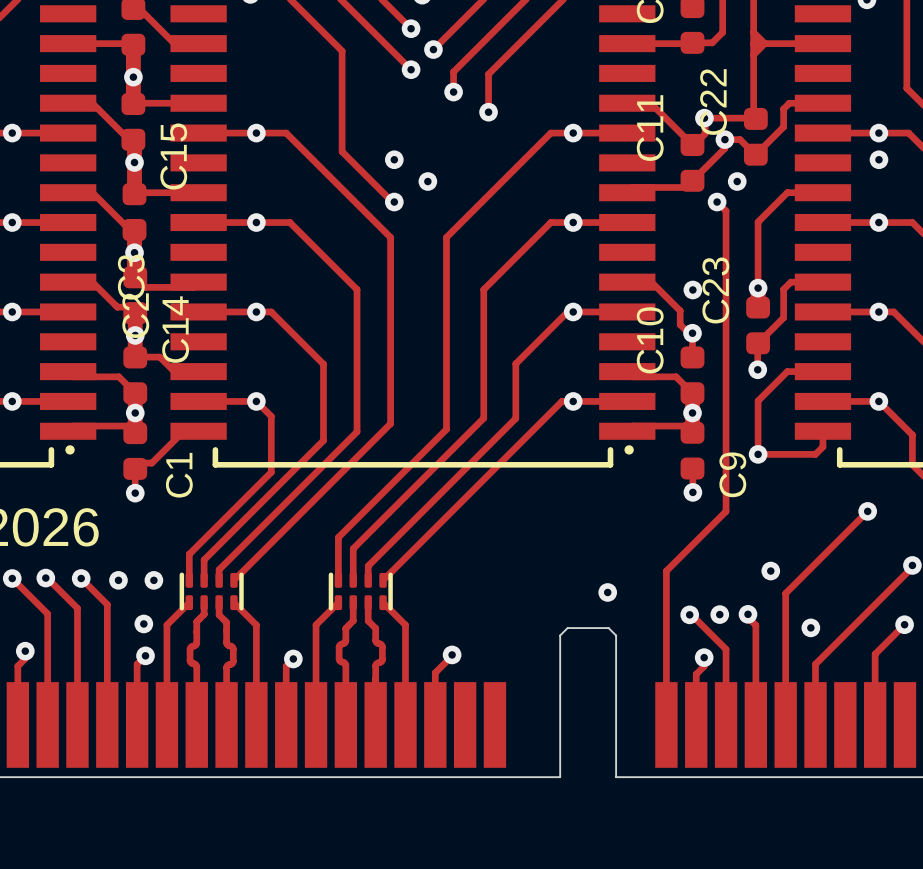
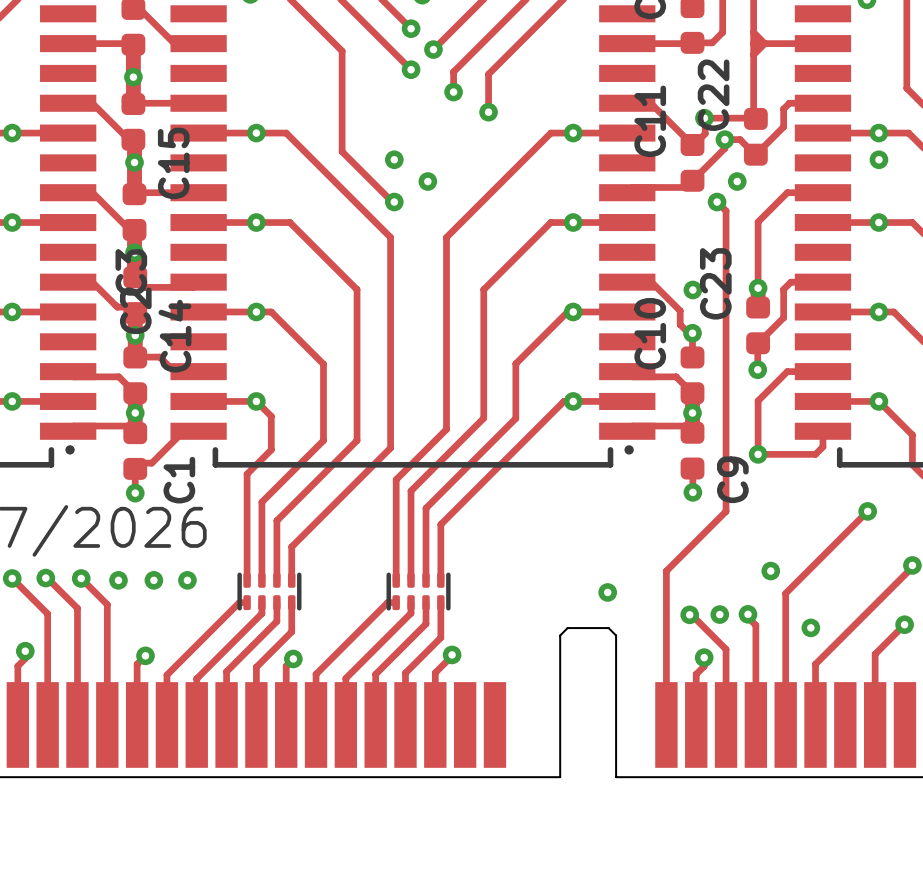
track: (563, 401) (383, 580) -> (563, 401) (440, 524) (440, 580)
track: (390, 423) (233, 580) -> (390, 423) (390, 448) (291, 546) (291, 580)
track: (357, 431) (219, 569) (219, 580) -> (357, 431) (357, 440) (276, 520) (276, 580)
track: (271, 449) (271, 472) (189, 554) (189, 580) -> (271, 449) (247, 474) (247, 580)
track: (396, 479) (338, 537) (338, 580) -> (396, 479) (396, 580)
track: (411, 490) (353, 548) (353, 580) -> (411, 490) (411, 580)
track: (261, 502) (204, 559) (204, 580) -> (261, 502) (261, 580)
track: (425, 508) (368, 566) (368, 580) -> (425, 508) (425, 580)
part: (211, 591) -> none
part: none -> (269, 591)
part: (360, 591) -> none
part: none -> (418, 591)
track: (189, 602) (166, 625) (166, 675) -> (247, 602) (239, 602) (166, 675)
track: (204, 602) (204, 614) (196, 621) (196, 643) (190, 649) (190, 661) (196, 666) (196, 678) -> (261, 602) (261, 613) (196, 678)
track: (219, 602) (219, 615) (226, 622) (226, 643) (233, 648) (233, 662) (227, 666) (226, 671) -> (276, 602) (276, 621) (226, 671)
track: (233, 602) (256, 625) (256, 667) -> (291, 602) (291, 631) (256, 667)
track: (338, 602) (316, 625) (316, 674) -> (396, 602) (387, 602) (316, 674)
track: (353, 602) (353, 620) (345, 628) (345, 642) (339, 646) (339, 660) (345, 664) (345, 678) -> (411, 602) (411, 613) (345, 678)
track: (368, 602) (368, 620) (375, 628) (376, 641) (382, 646) (382, 660) (376, 664) (375, 674) -> (425, 602) (425, 623) (375, 674)
track: (383, 602) (405, 625) (405, 673) -> (440, 602) (440, 637) (405, 673)
via position: (143, 623) -> (187, 580)

